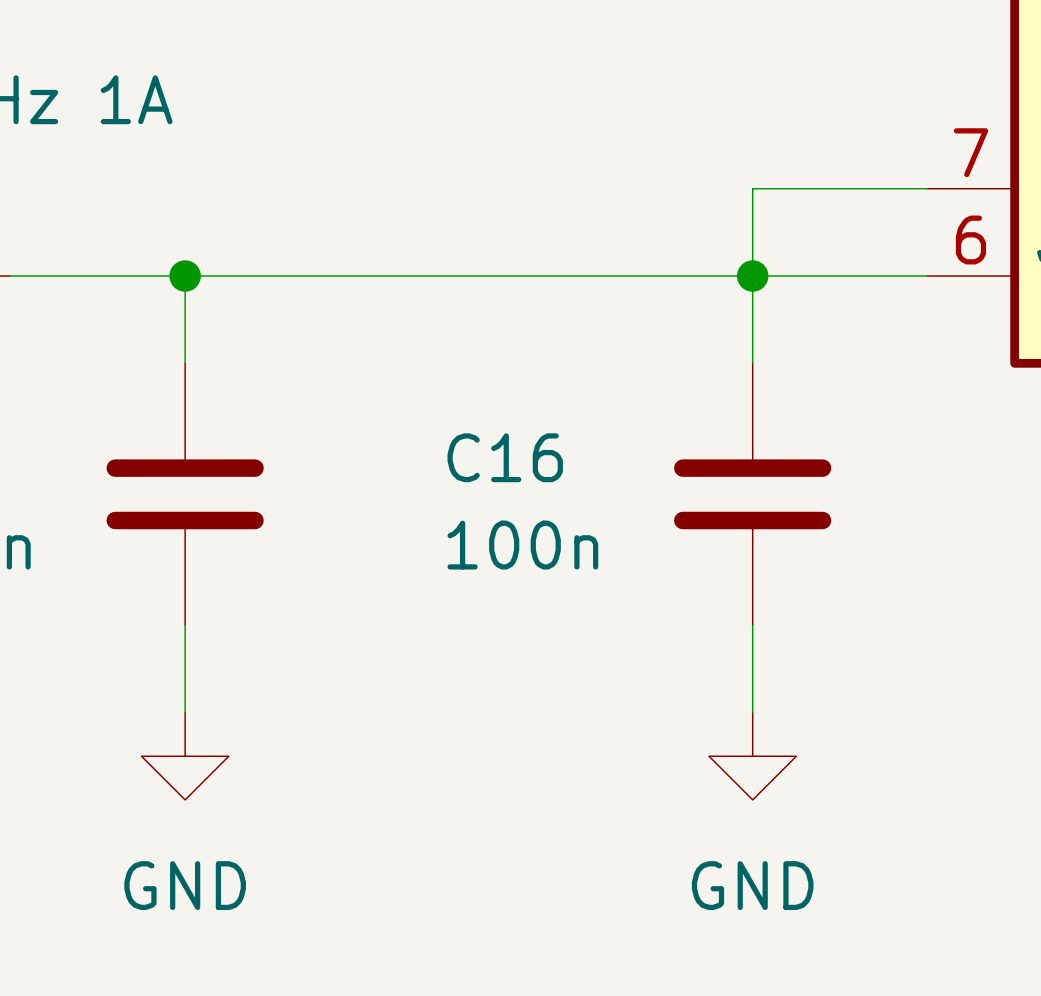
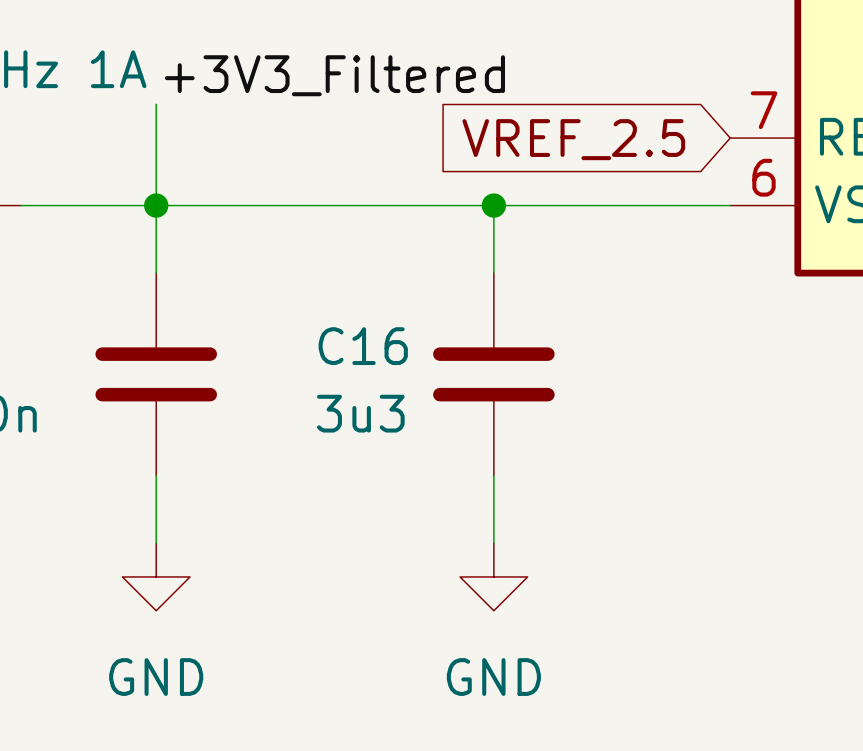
label: none -> +3V3_Filtered (334, 75)
wire: none -> (156, 104) (156, 205)
wire: (927, 188) (752, 188) (752, 363) -> none
global label: none -> VREF_2.5 (573, 139)
wire: none -> (493, 205) (493, 273)
junction position: (752, 276) -> (493, 205)
C16 name position: C16 (505, 457) -> C16 (363, 346)
C16 position: (752, 494) -> (493, 374)
C16 value: 100n (522, 545) -> 3u3 (360, 413)
wire: (752, 625) (752, 712) -> (493, 475) (493, 543)
power symbol position: GND (752, 756) -> GND (493, 576)

